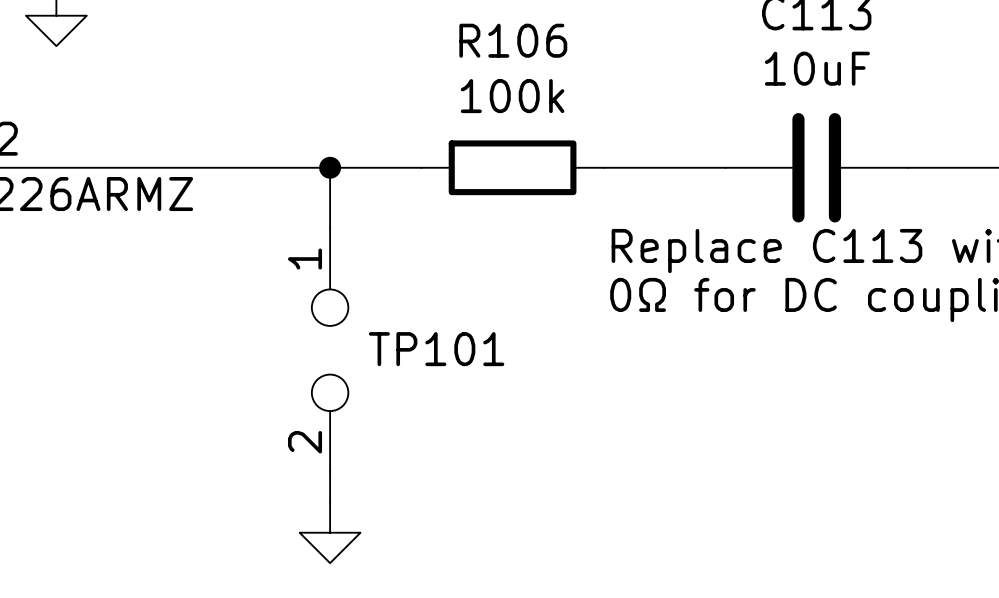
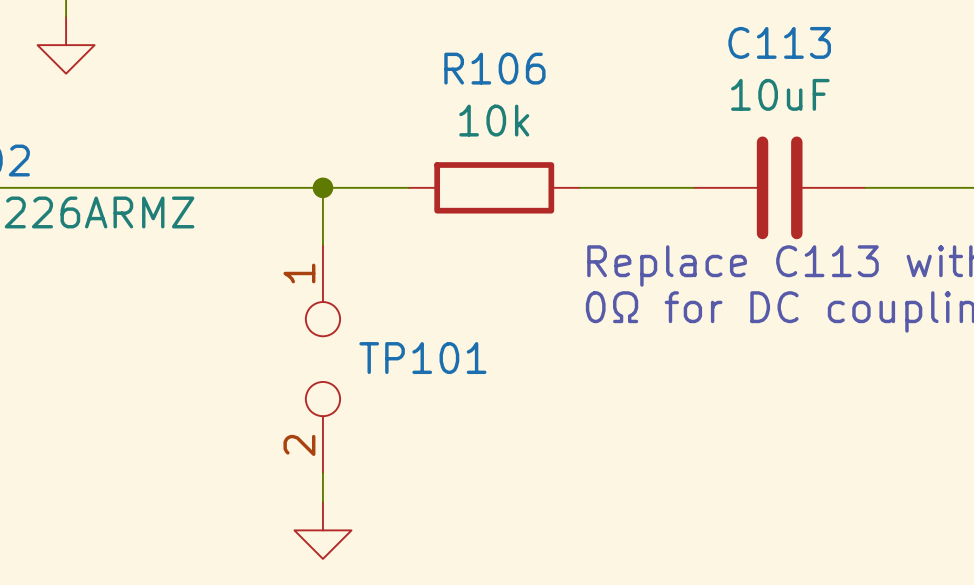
R106 value: 100k (512, 96) -> 10k (494, 120)

